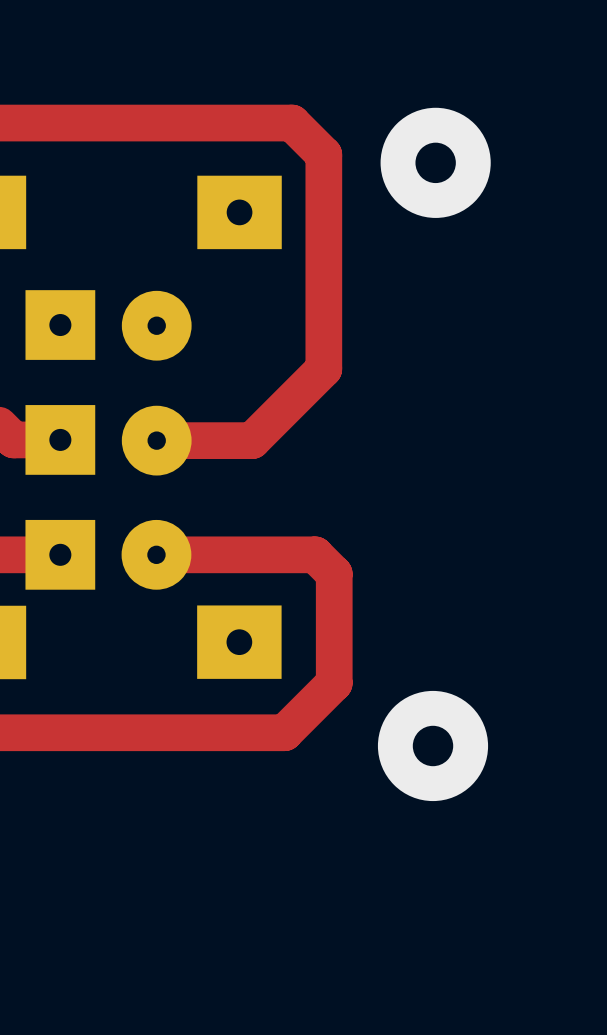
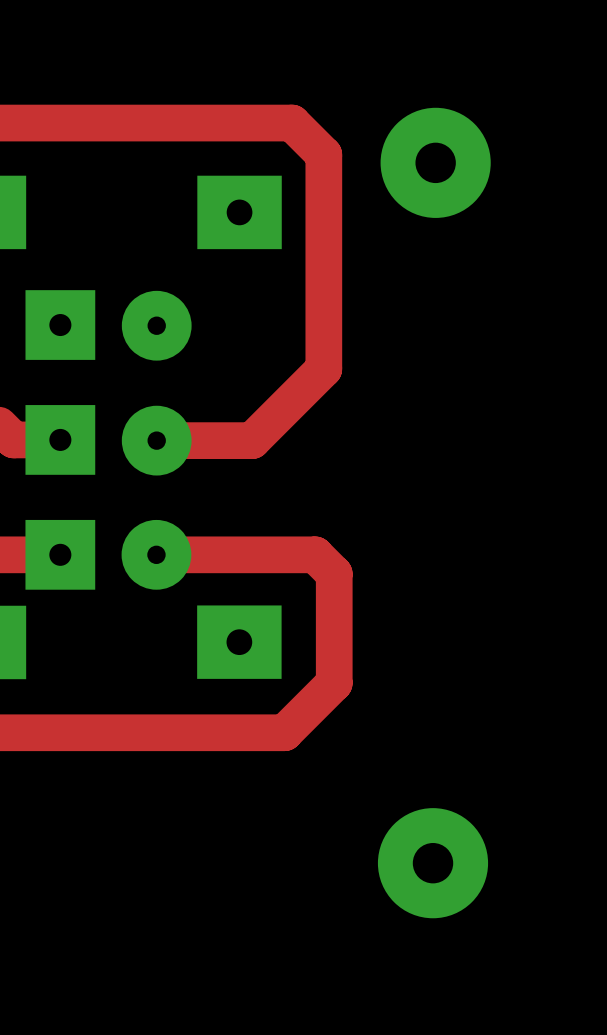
via position: (433, 745) -> (433, 863)

